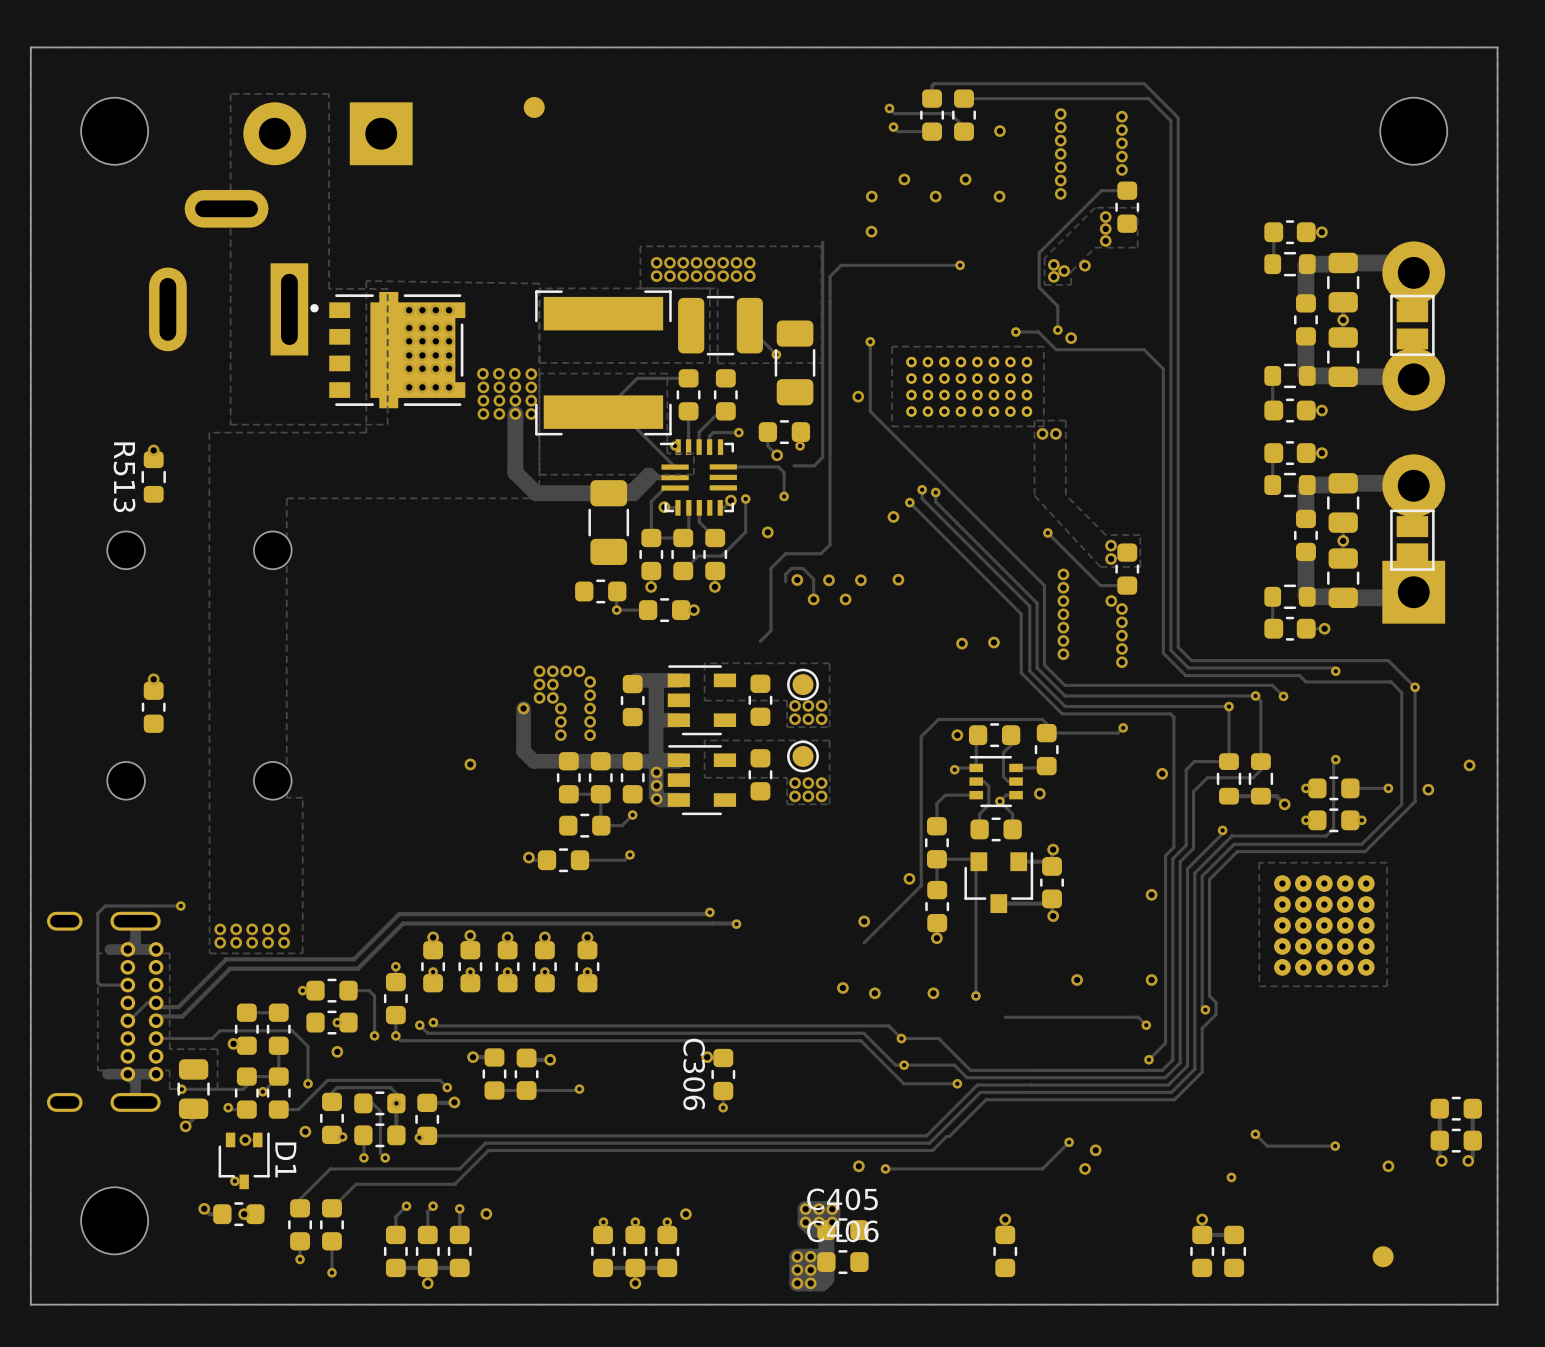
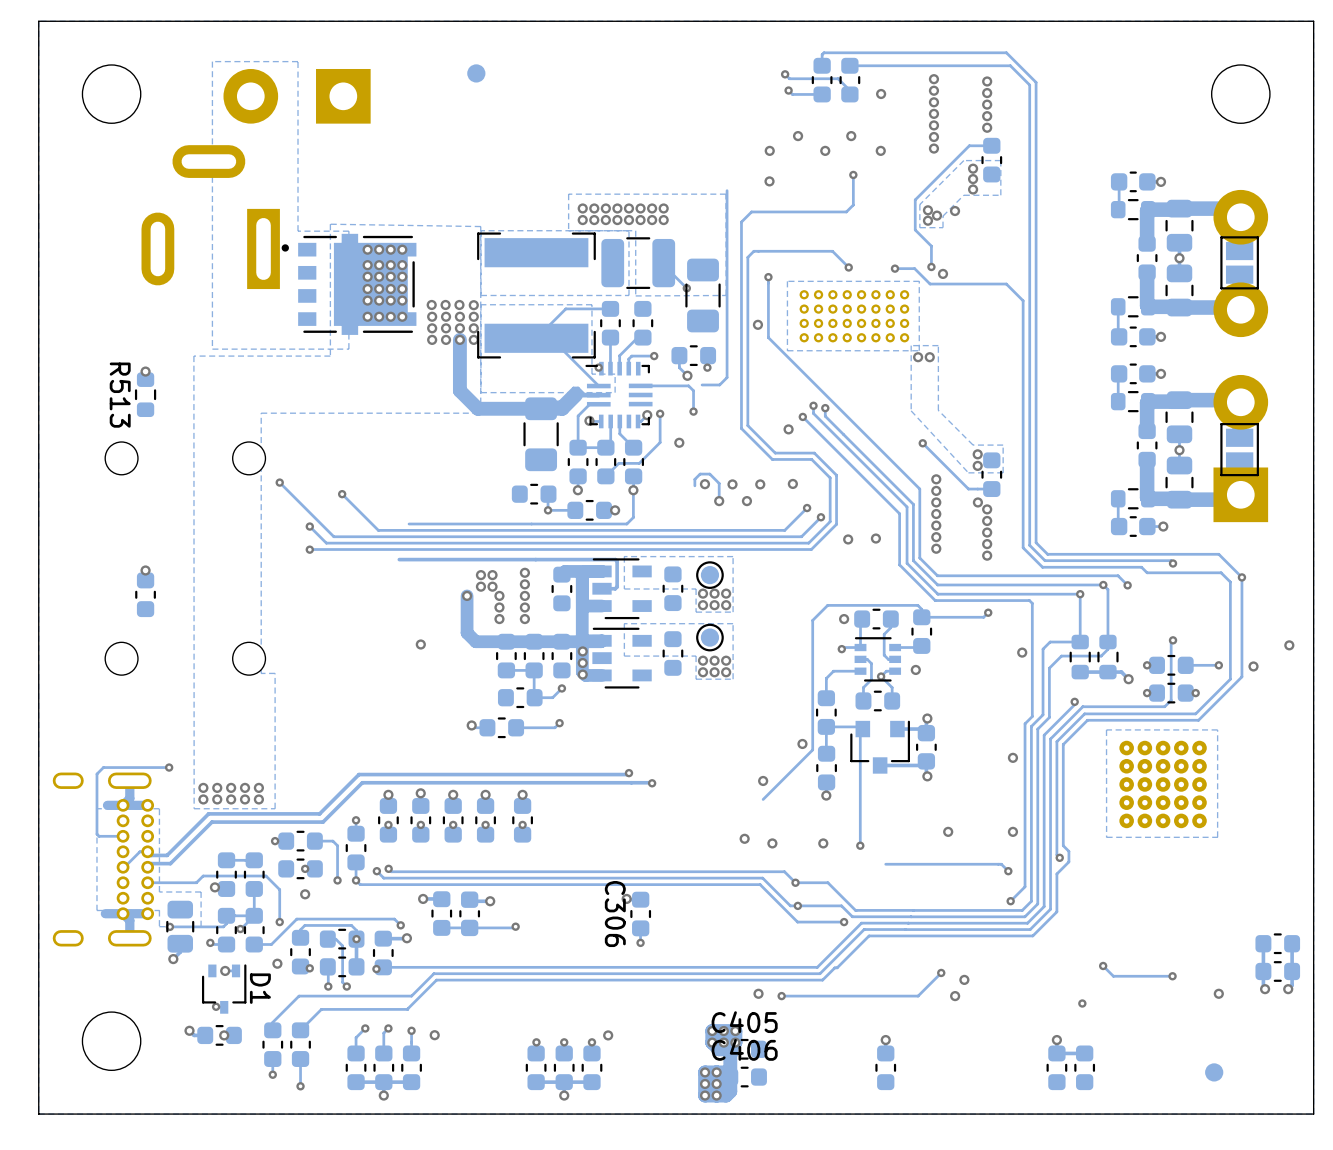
track: none -> (853, 174) (853, 205) (846, 211) (751, 211) (741, 222) (741, 428) (772, 459) (811, 459) (830, 477) (830, 521) (808, 543) (326, 543) (309, 526)
via: none -> (853, 174)
track: (960, 265) (841, 265) (830, 276) (830, 544) (821, 553) (785, 553) (770, 568) (770, 630) (760, 641) -> none
via: (960, 265) -> none
track: none -> (848, 267) (832, 251) (753, 251) (747, 257) (747, 425) (775, 453) (814, 453) (836, 475) (836, 524) (811, 549) (309, 549)
via: none -> (848, 267)
track: none -> (279, 482) (333, 536) (801, 536) (820, 517)
via: none -> (279, 482)
track: none -> (633, 490) (633, 517) (626, 524) (409, 524)
track: none -> (342, 494) (378, 530) (784, 530) (807, 508)
via: none -> (342, 494)
via: none -> (807, 508)
via: none -> (820, 517)
via: none -> (309, 526)
via: none -> (309, 549)
track: none -> (399, 559) (615, 559) (617, 586) (615, 588) (602, 588)
via: (539, 671) -> none
via: (552, 671) -> none
via: (566, 671) -> none
via: (579, 671) -> none

